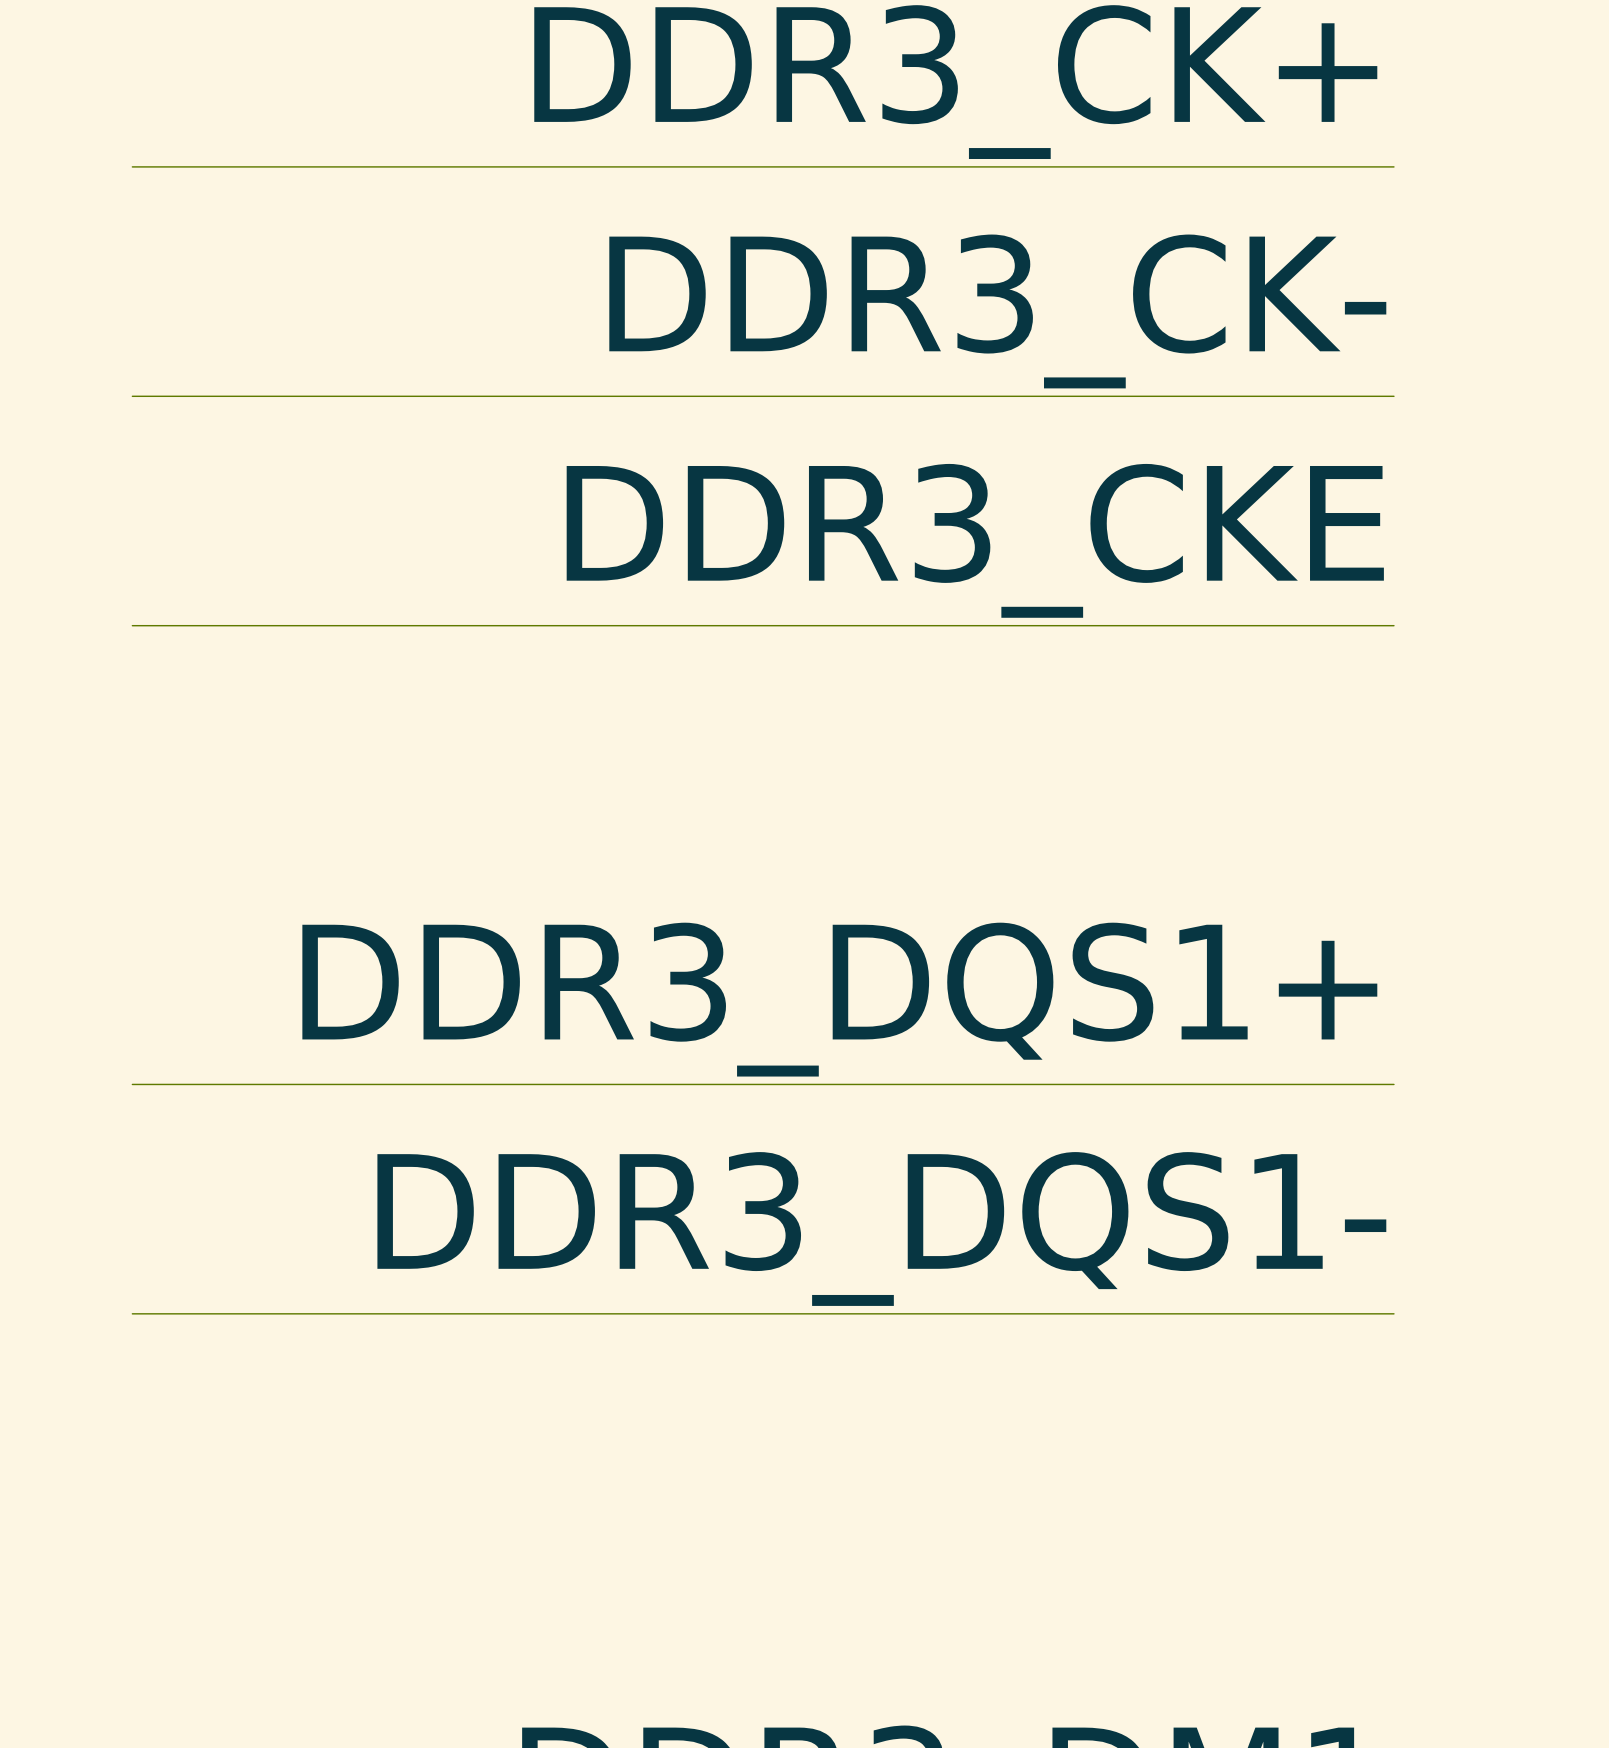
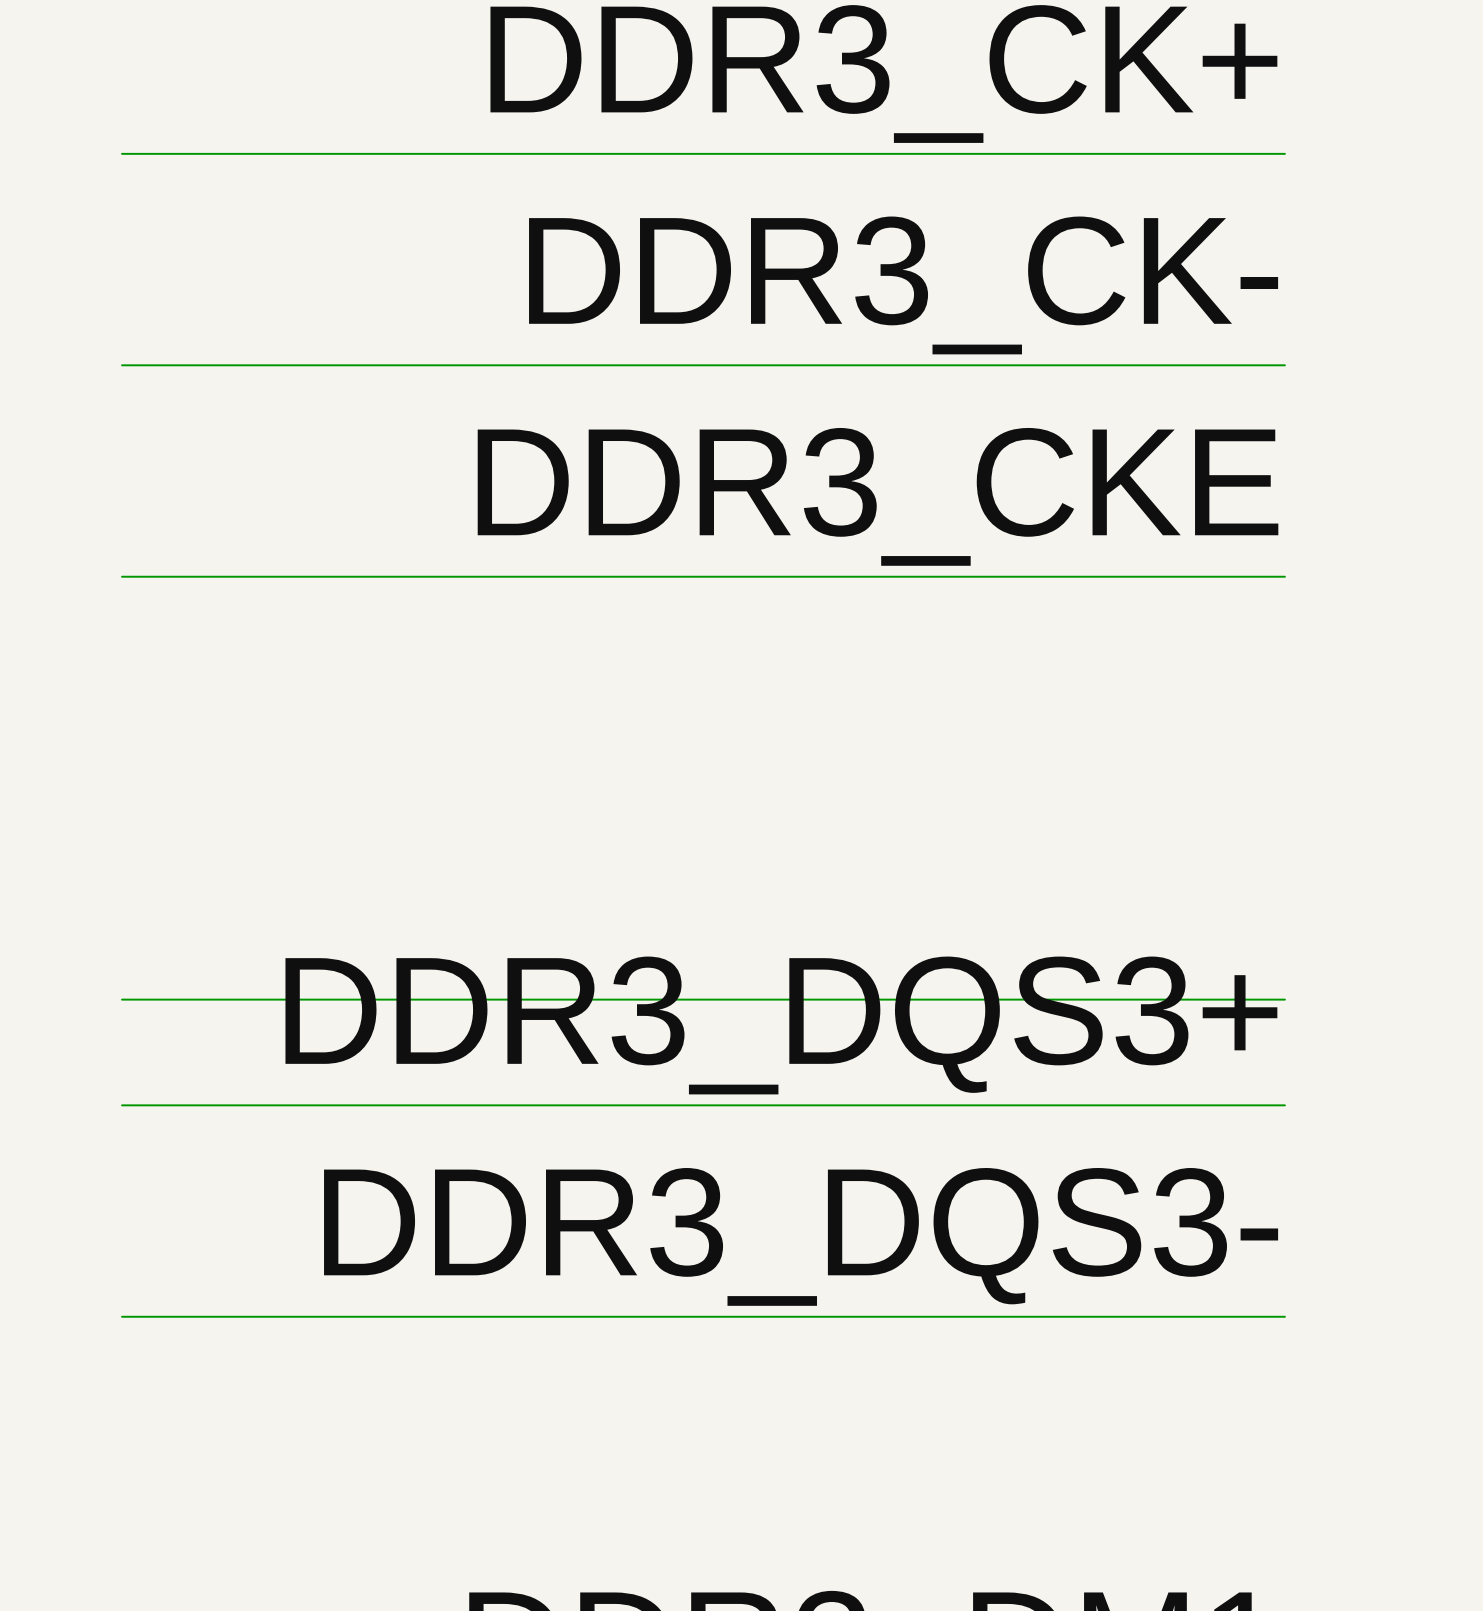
label: DDR3_DQS1+ (839, 999) -> none
label: none -> DDR3_DQS3+ (781, 1025)
label: DDR3_DQS1- (881, 1229) -> none
wire: (132, 1313) (1393, 1313) -> (122, 1105) (1284, 1105)
label: none -> DDR3_DQS3- (801, 1236)
wire: none -> (122, 1316) (1284, 1316)

